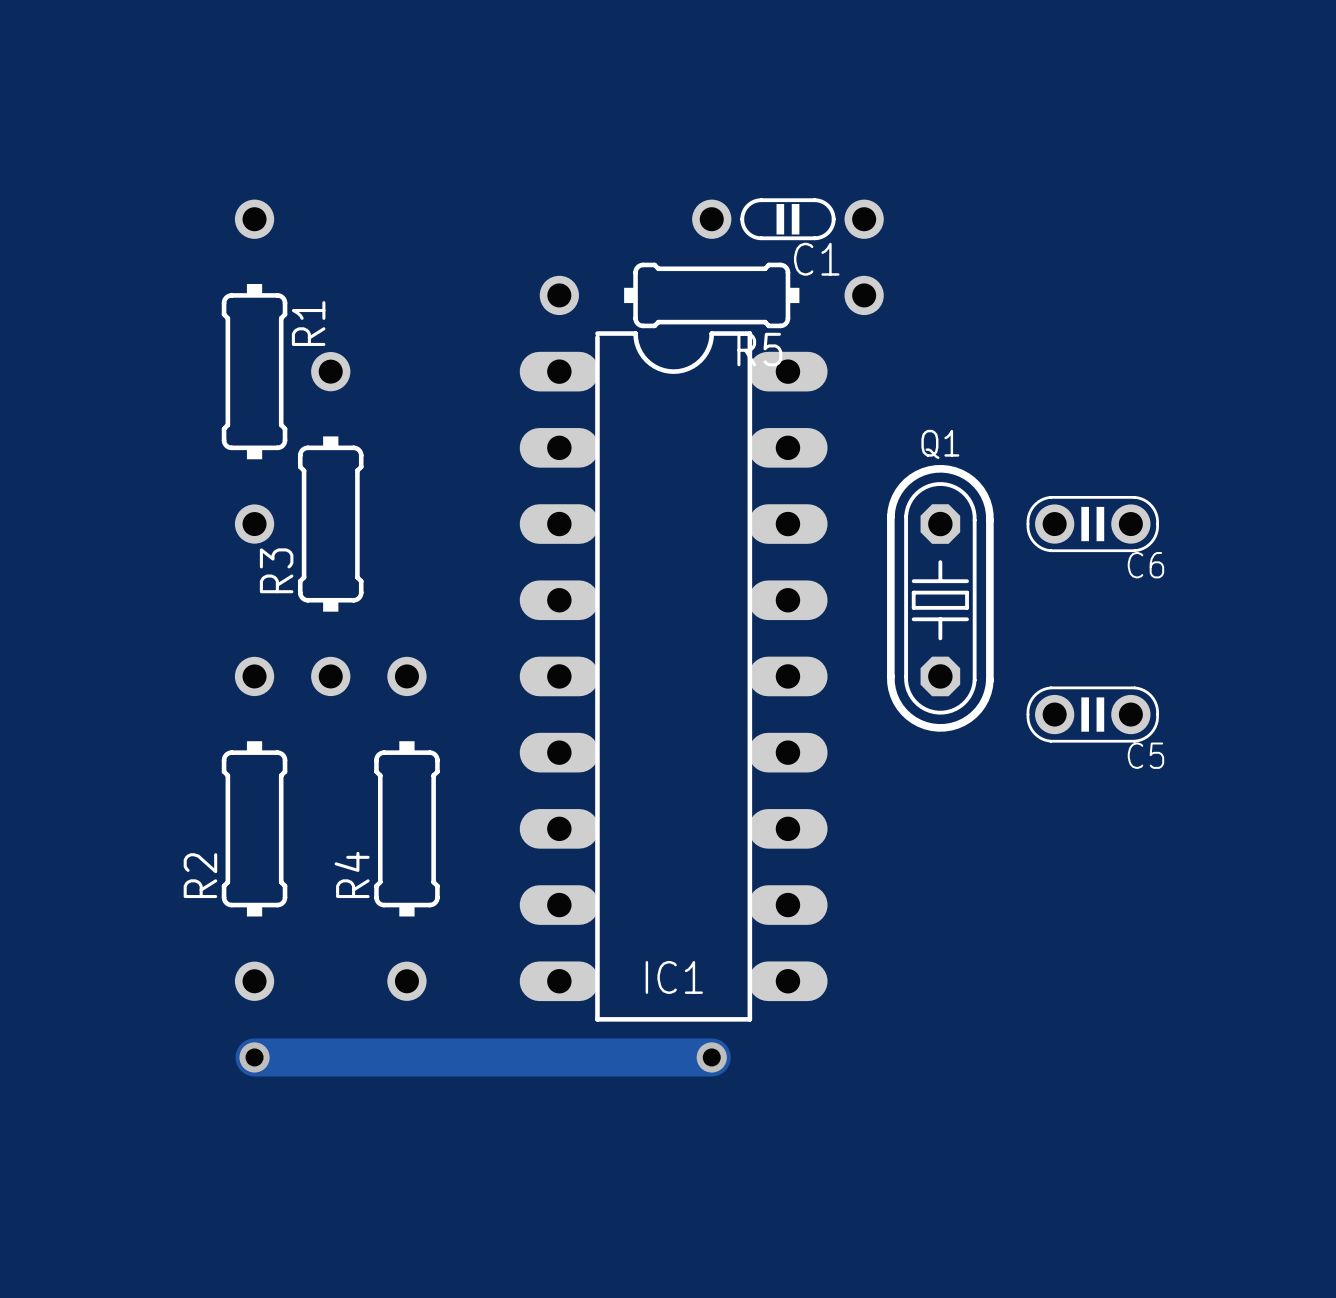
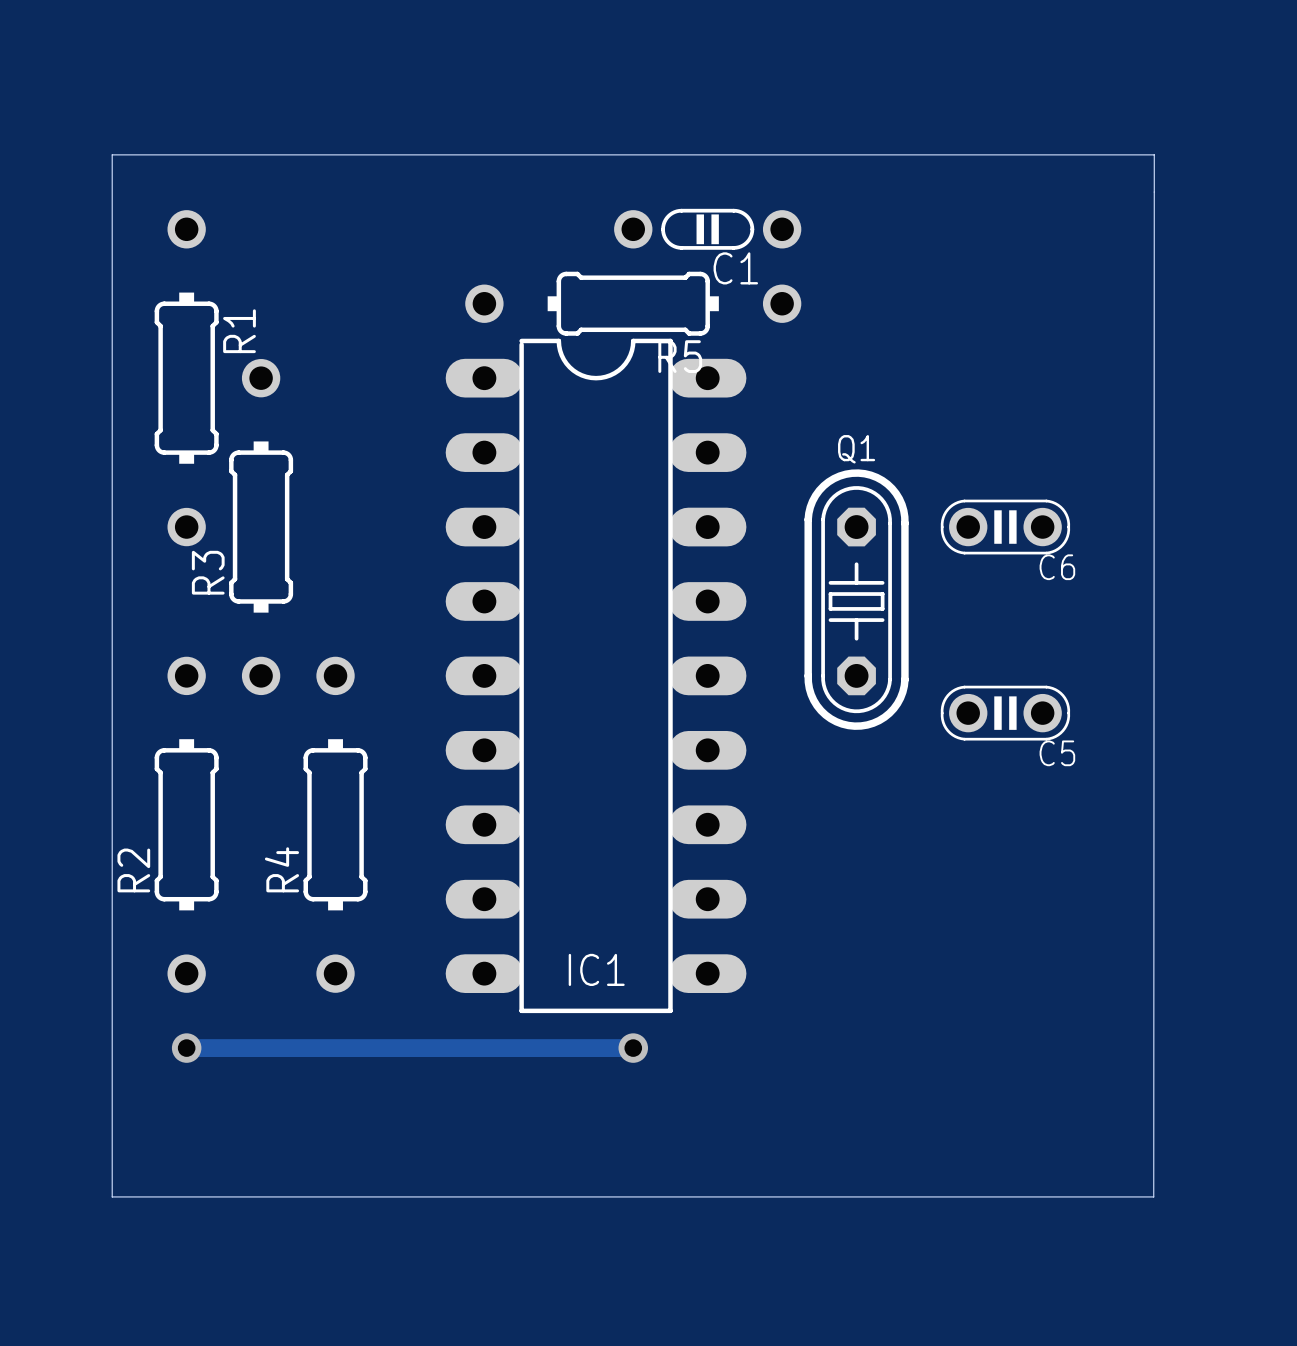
board edge: none -> (112, 154) (1154, 154) (1153, 1196) (112, 1196) (112, 154)
track width: thick (254, 1057) (711, 1057) -> thin (186, 1048) (633, 1048)

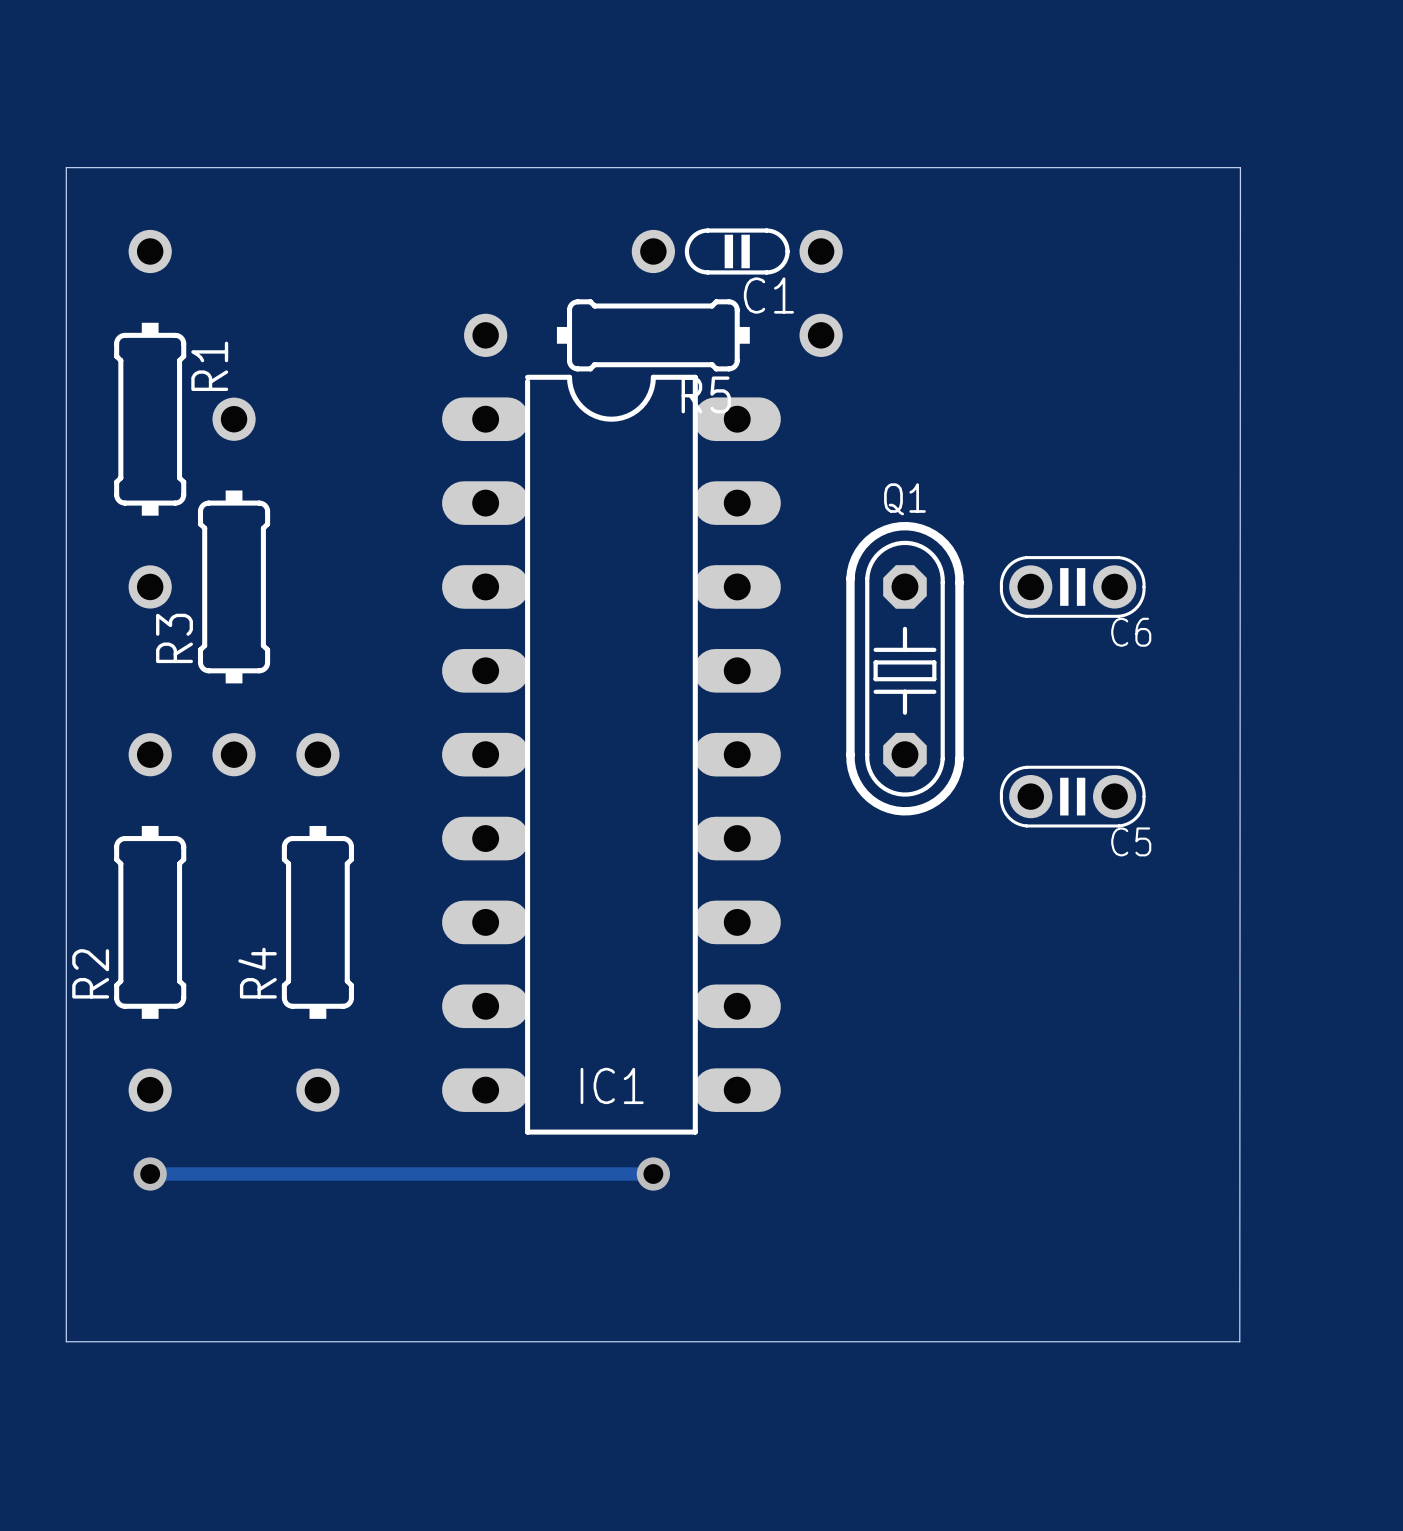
track width: thick (186, 1048) (633, 1048) -> thin (150, 1174) (653, 1174)

